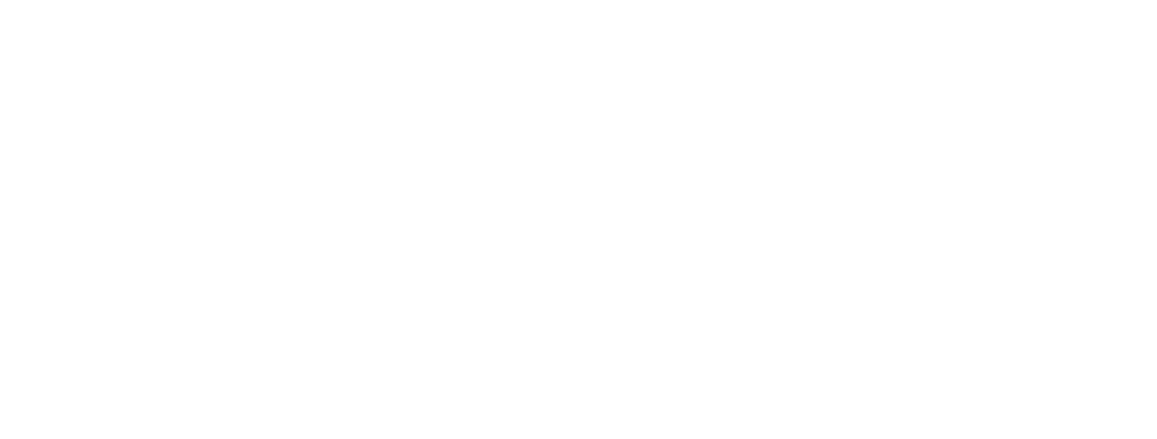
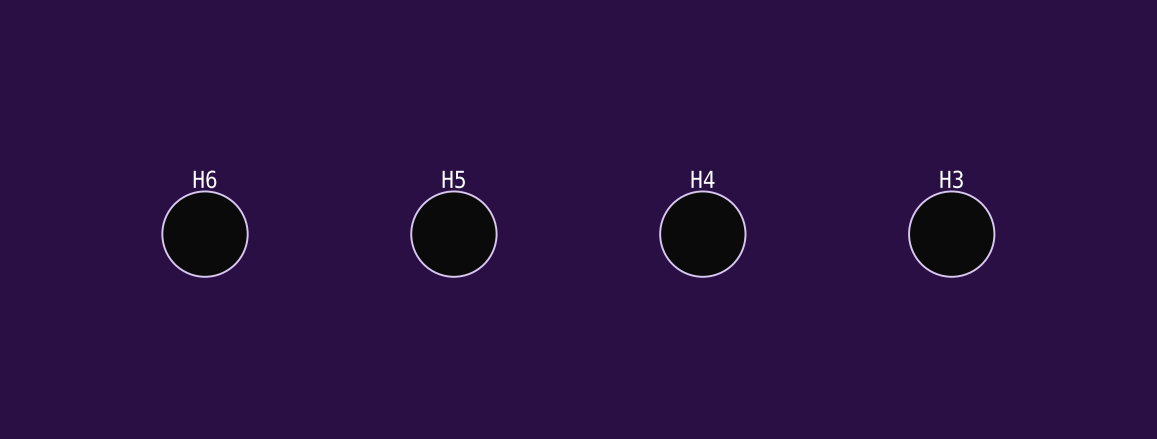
H6: none -> (205, 234)
H5: none -> (453, 234)
H4: none -> (702, 234)
H3: none -> (951, 234)

